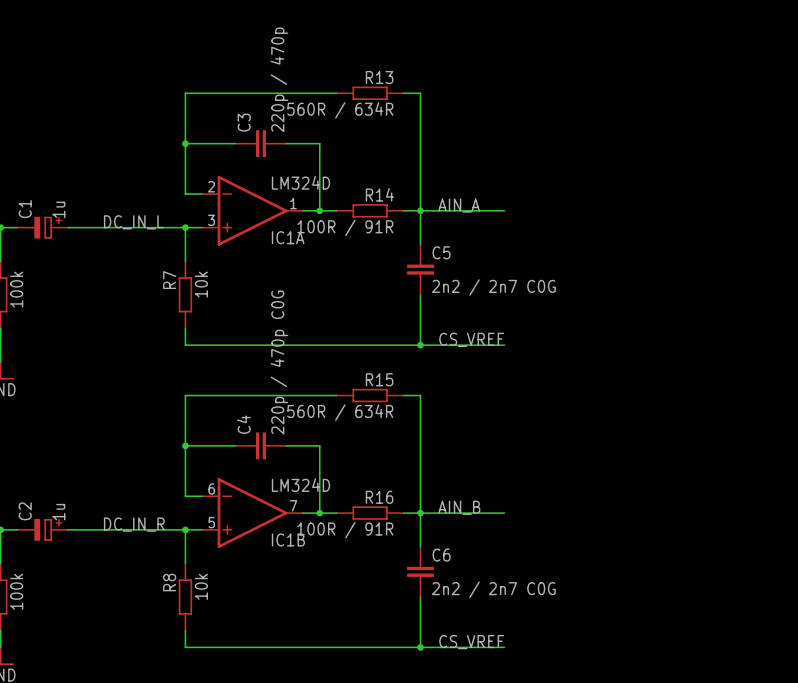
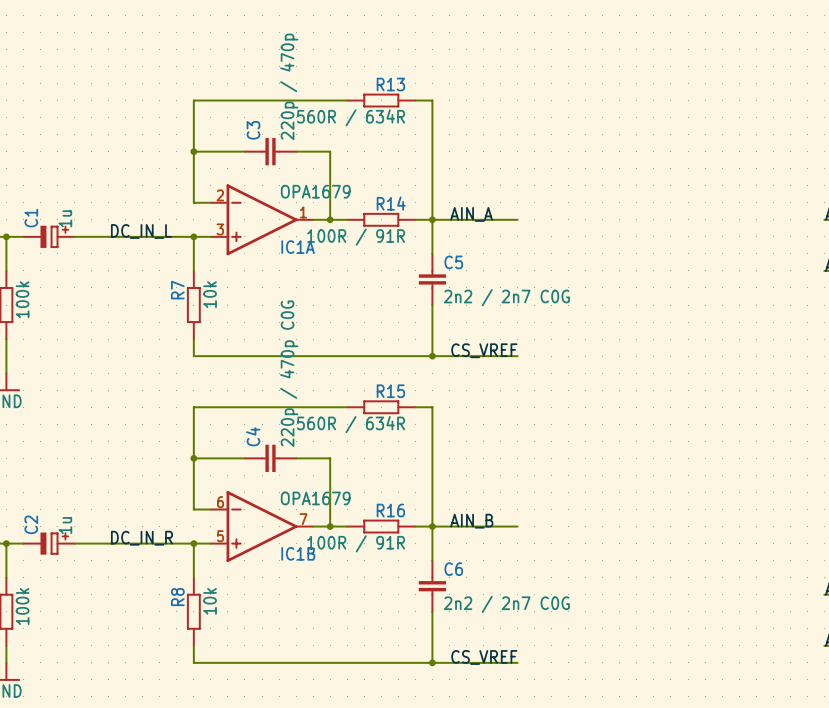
IC1A value: LM324D (300, 182) -> OPA1679 (315, 191)
IC1B value: LM324D (300, 485) -> OPA1679 (315, 498)

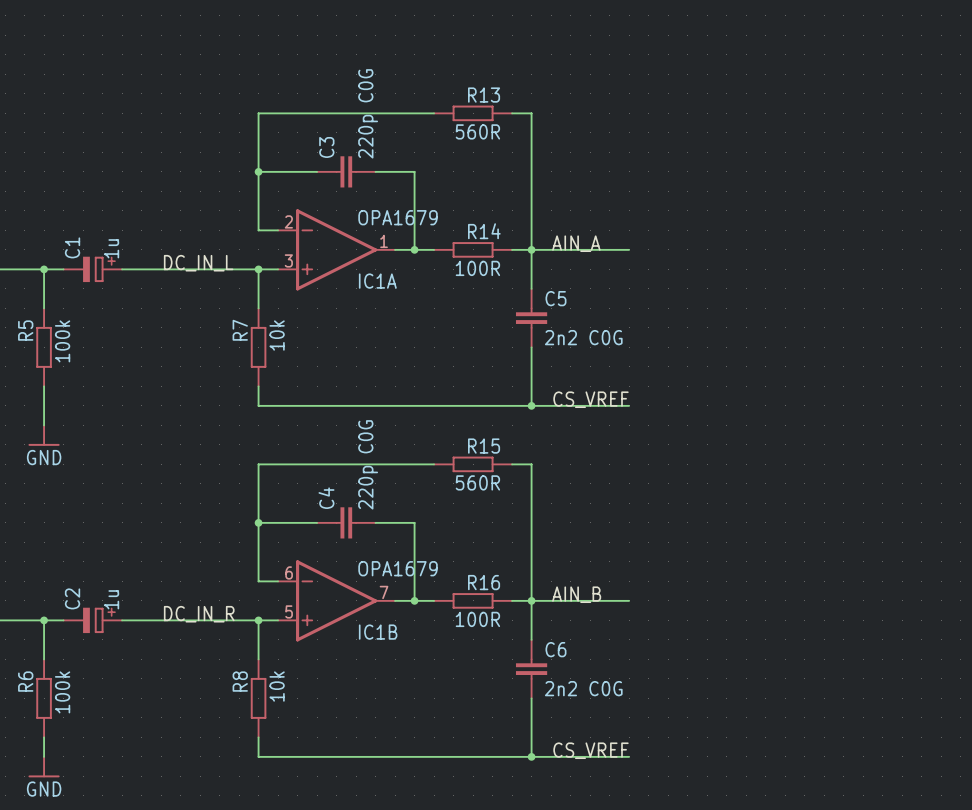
C3 value: 220p / 470p (289, 86) -> 220p C0G (368, 113)
R13 value: 560R / 634R (351, 117) -> 560R (477, 131)
R14 value: 100R / 91R (356, 237) -> 100R (477, 268)
C5 value: 2n2 / 2n7 C0G (506, 297) -> 2n2 C0G (583, 337)
C4 value: 220p / 470p C0G (289, 373) -> 220p C0G (368, 464)
R15 value: 560R / 634R (351, 424) -> 560R (477, 482)
R16 value: 100R / 91R (356, 543) -> 100R (477, 619)
C6 value: 2n2 / 2n7 C0G (506, 604) -> 2n2 C0G (583, 688)

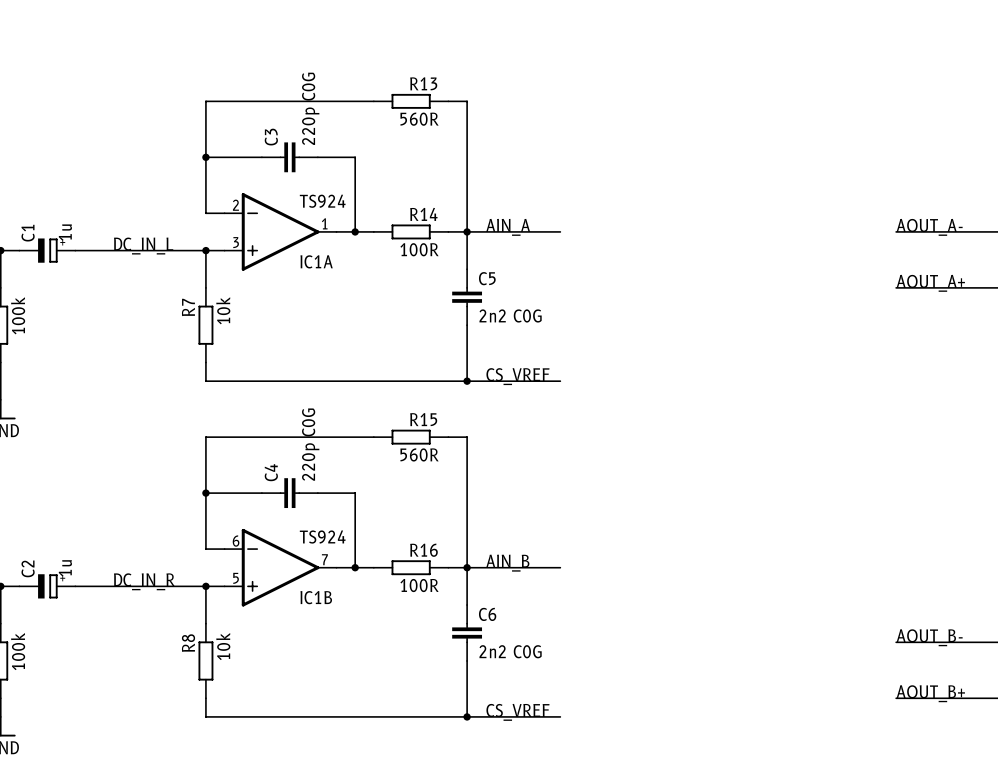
IC1A value: OPA1679 (398, 217) -> TS924 (322, 201)
IC1B value: OPA1679 (398, 568) -> TS924 (322, 537)

